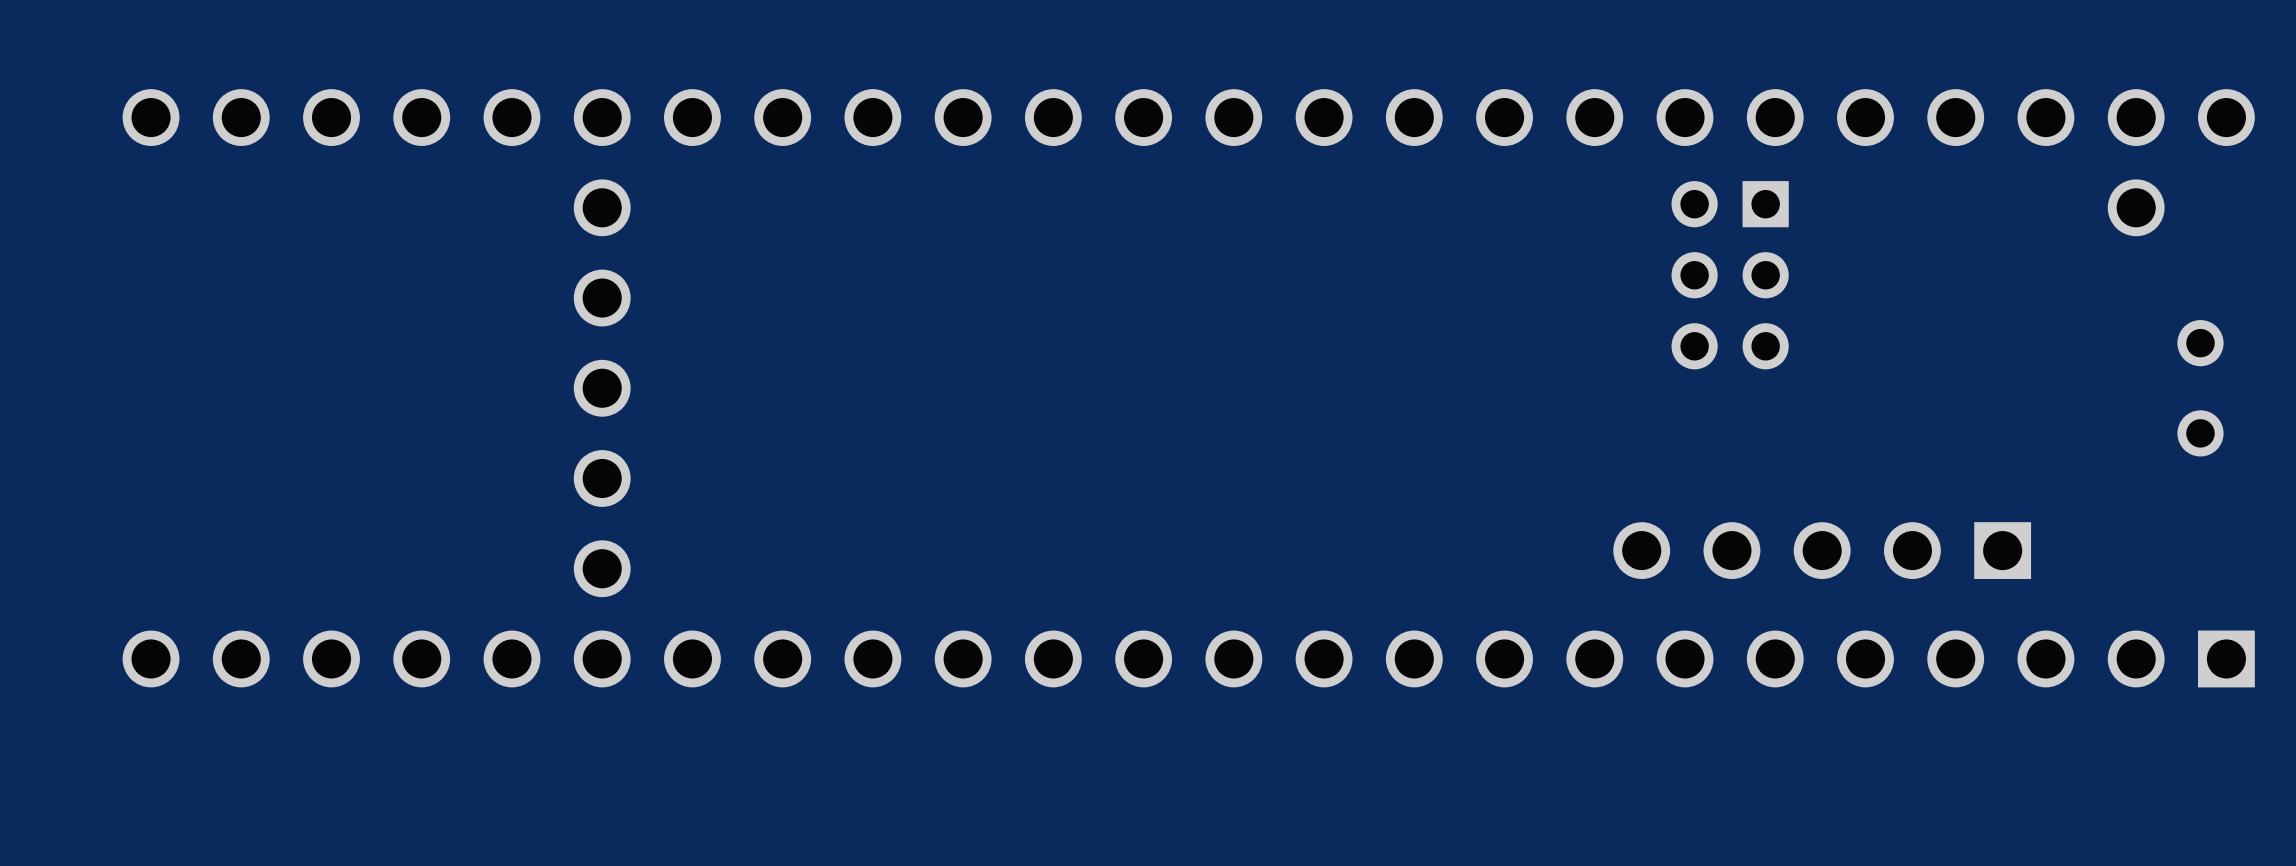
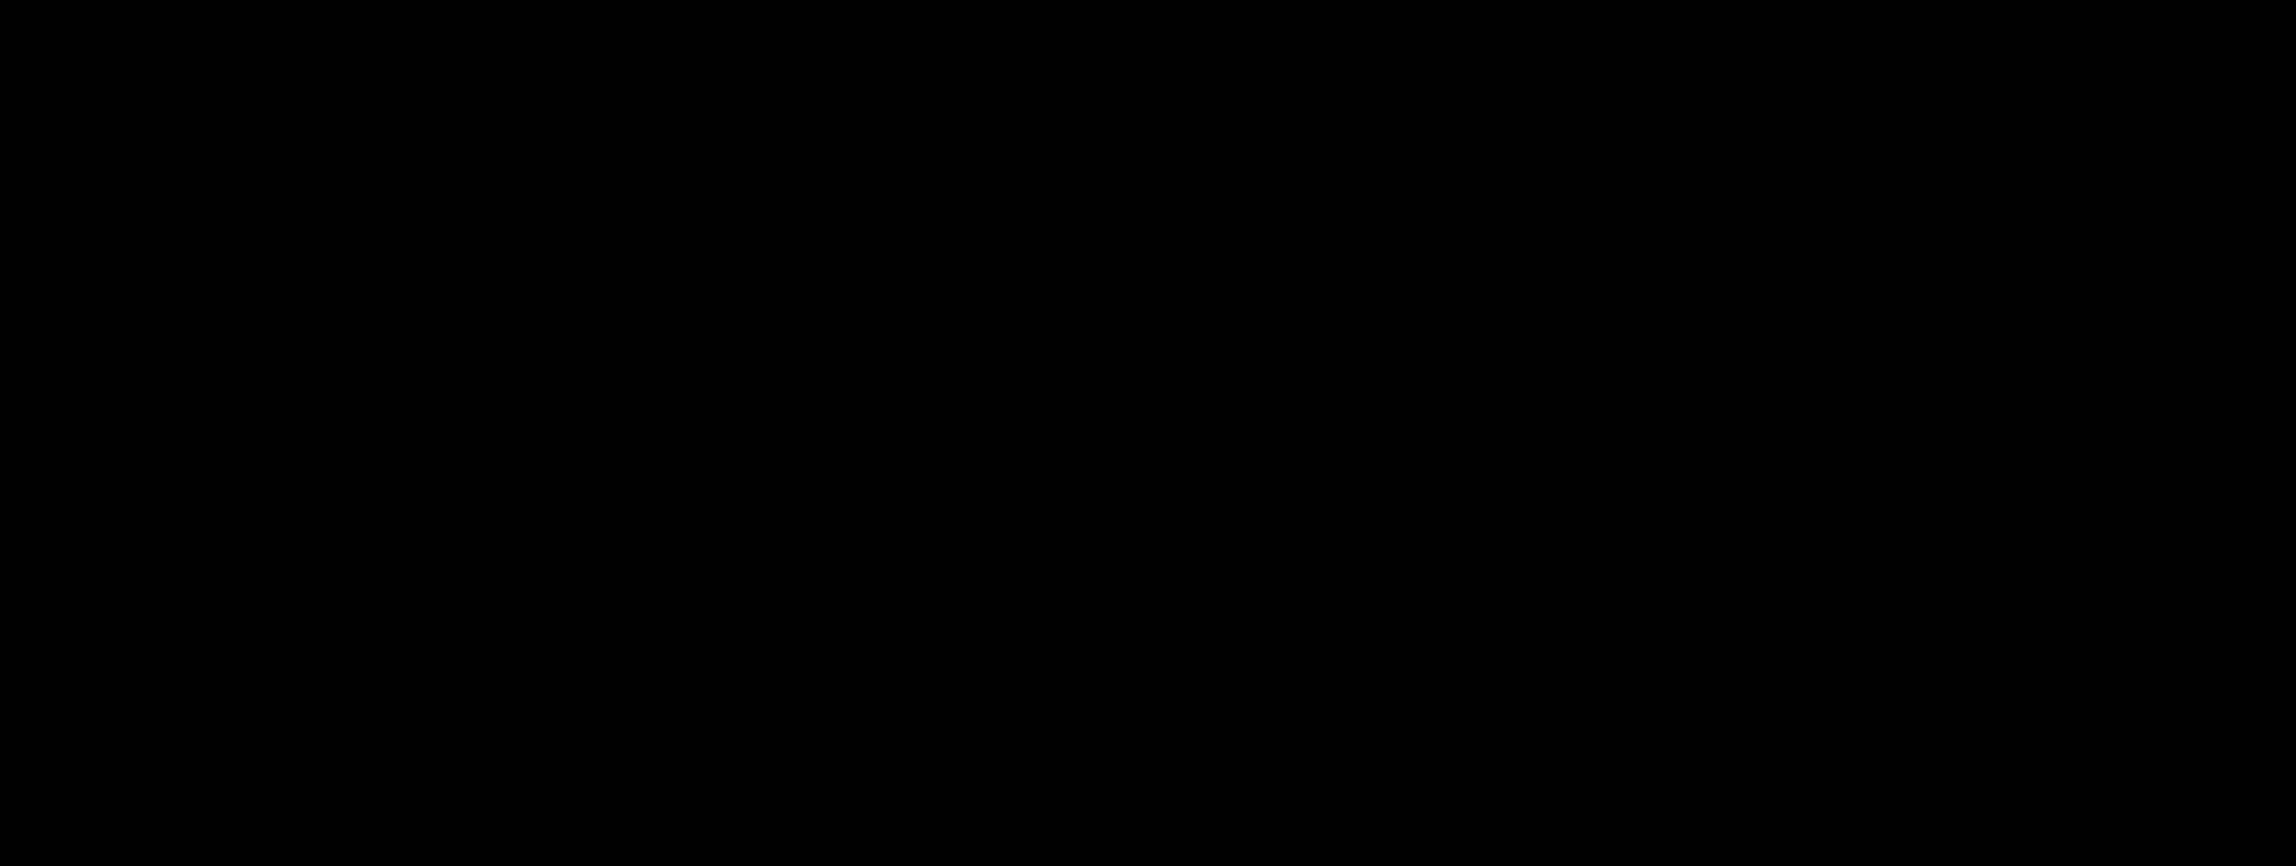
part: (1188, 388) -> none

